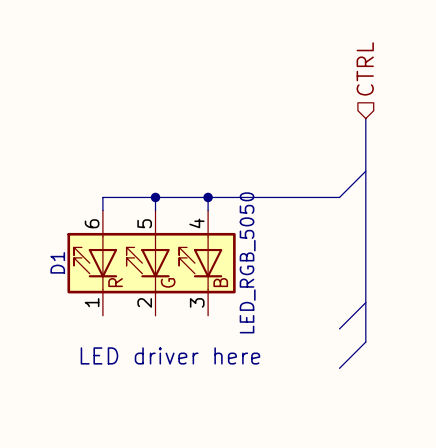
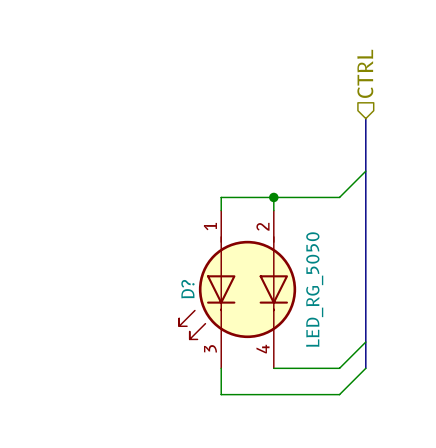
wire: (155, 197) (155, 210) -> none
junction: (155, 197) -> none
wire: (208, 197) (208, 210) -> (273, 197) (273, 210)
junction: (208, 197) -> none
wire: (221, 197) (102, 197) (102, 210) -> (221, 197) (221, 210)
junction: none -> (273, 197)
D1: LED_RGB_5050 (151, 263) -> none
D?: none -> LED_RG_5050 (237, 289)
wire: (365, 302) (339, 328) -> none
bus: none -> (365, 342) (365, 368)
text: LED driver here (170, 355) -> none
wire: none -> (221, 368) (221, 394) (339, 394) (365, 368)
wire: none -> (273, 368) (339, 368)

